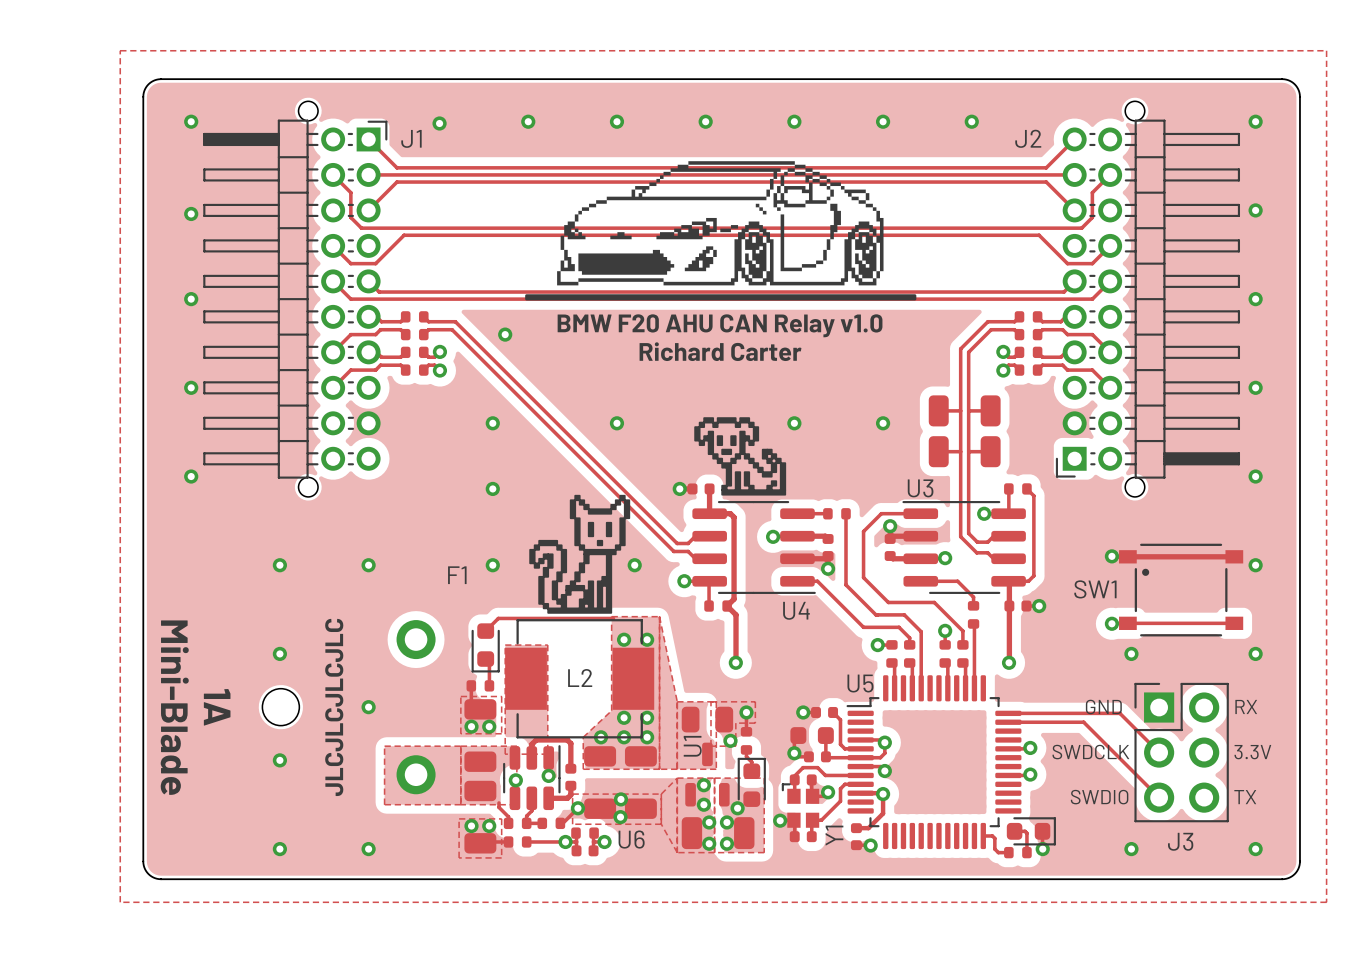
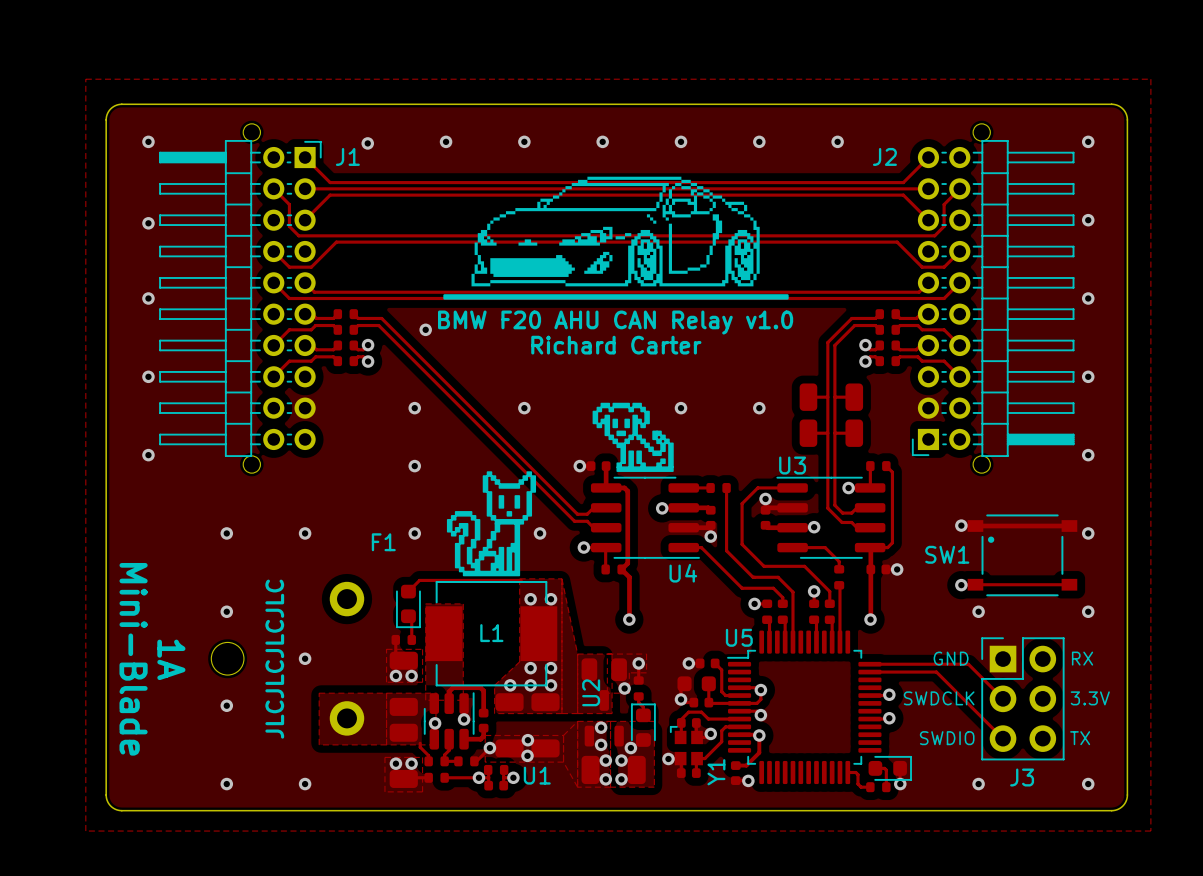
L2 name: L2 (580, 678) -> L1 (491, 633)
U1 name: U1 (692, 746) -> U2 (591, 692)
U6 name: U6 (631, 839) -> U1 (537, 775)

